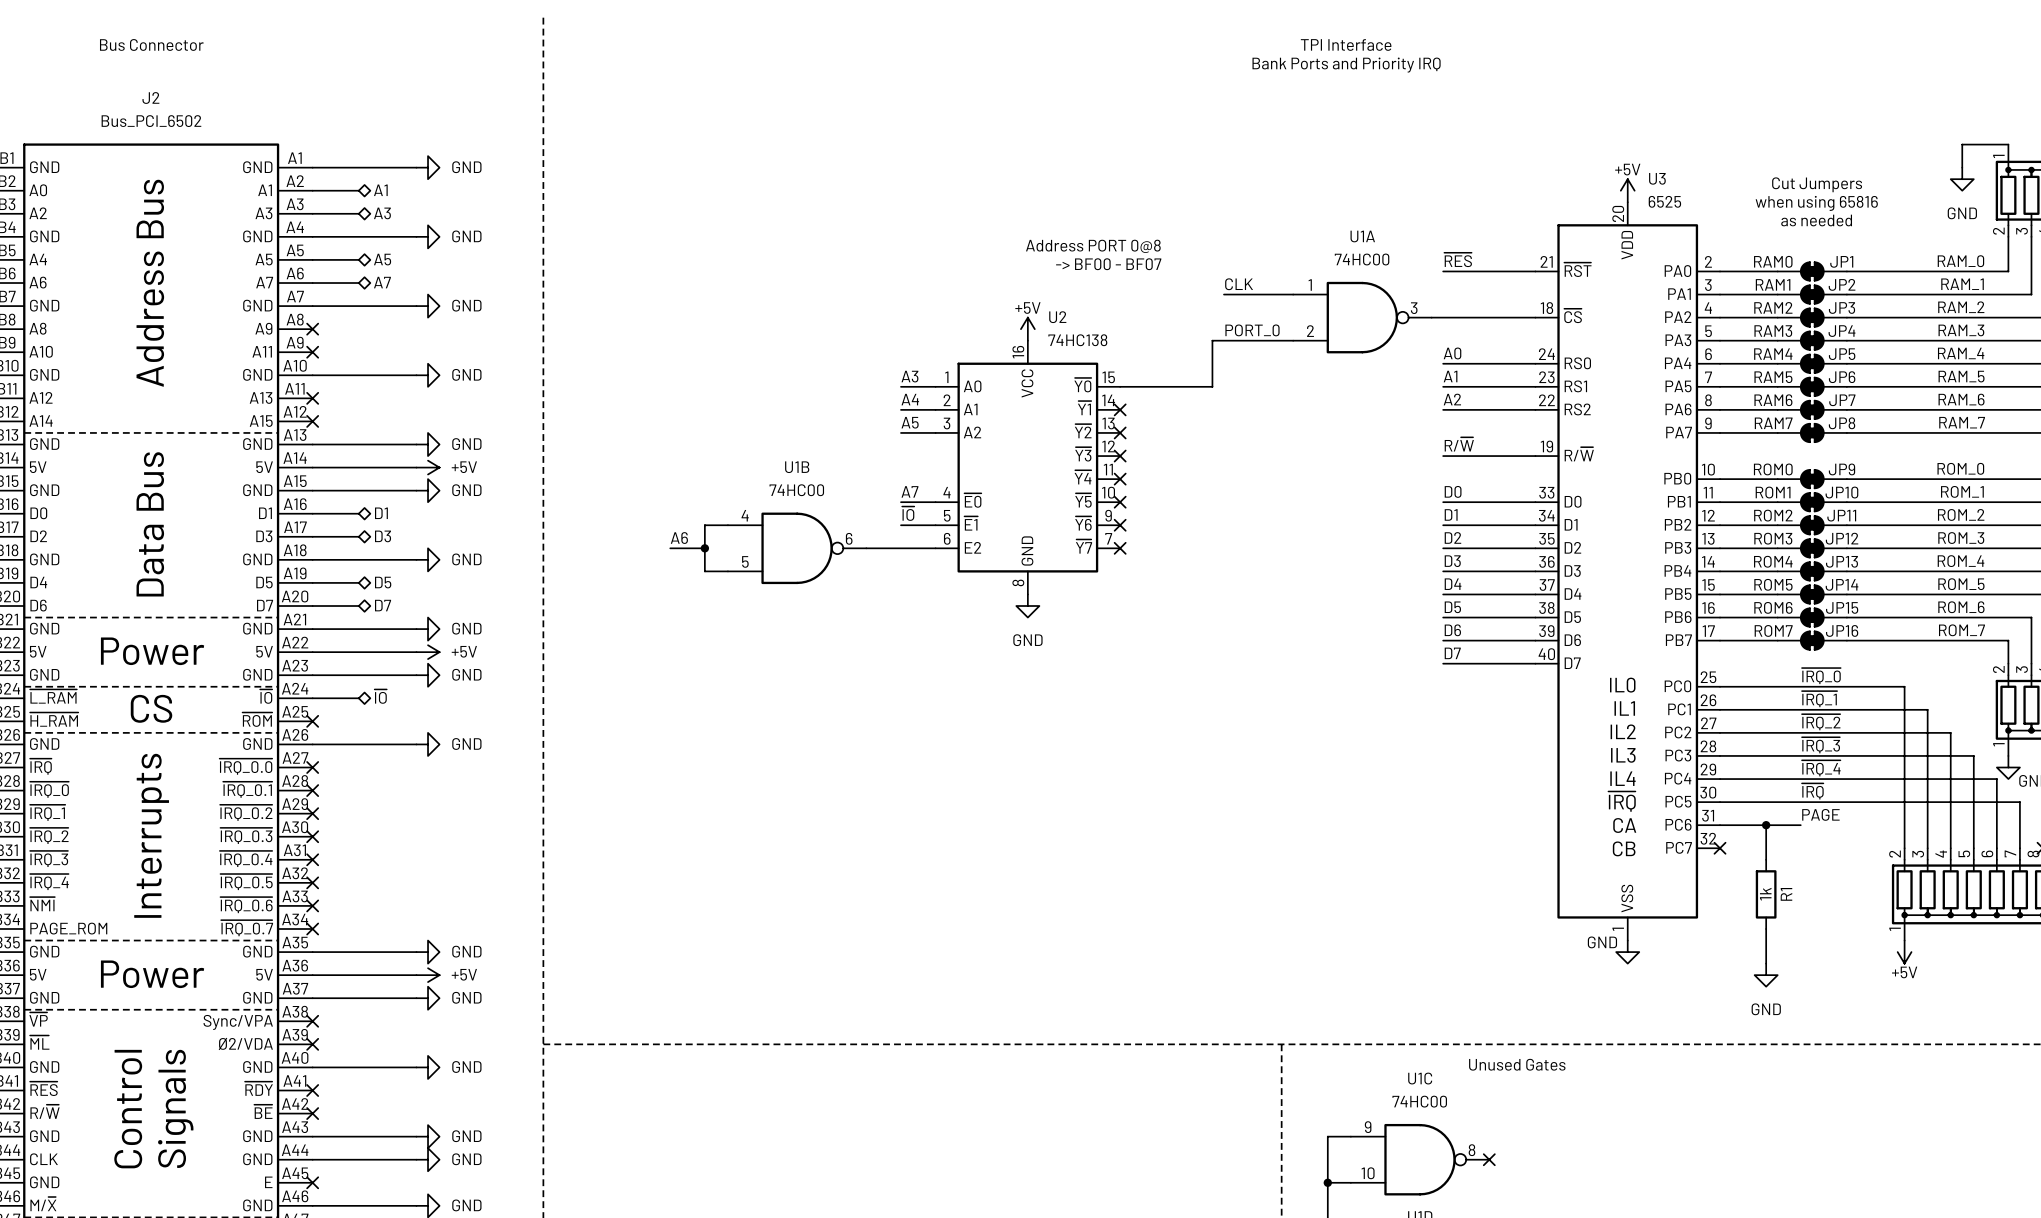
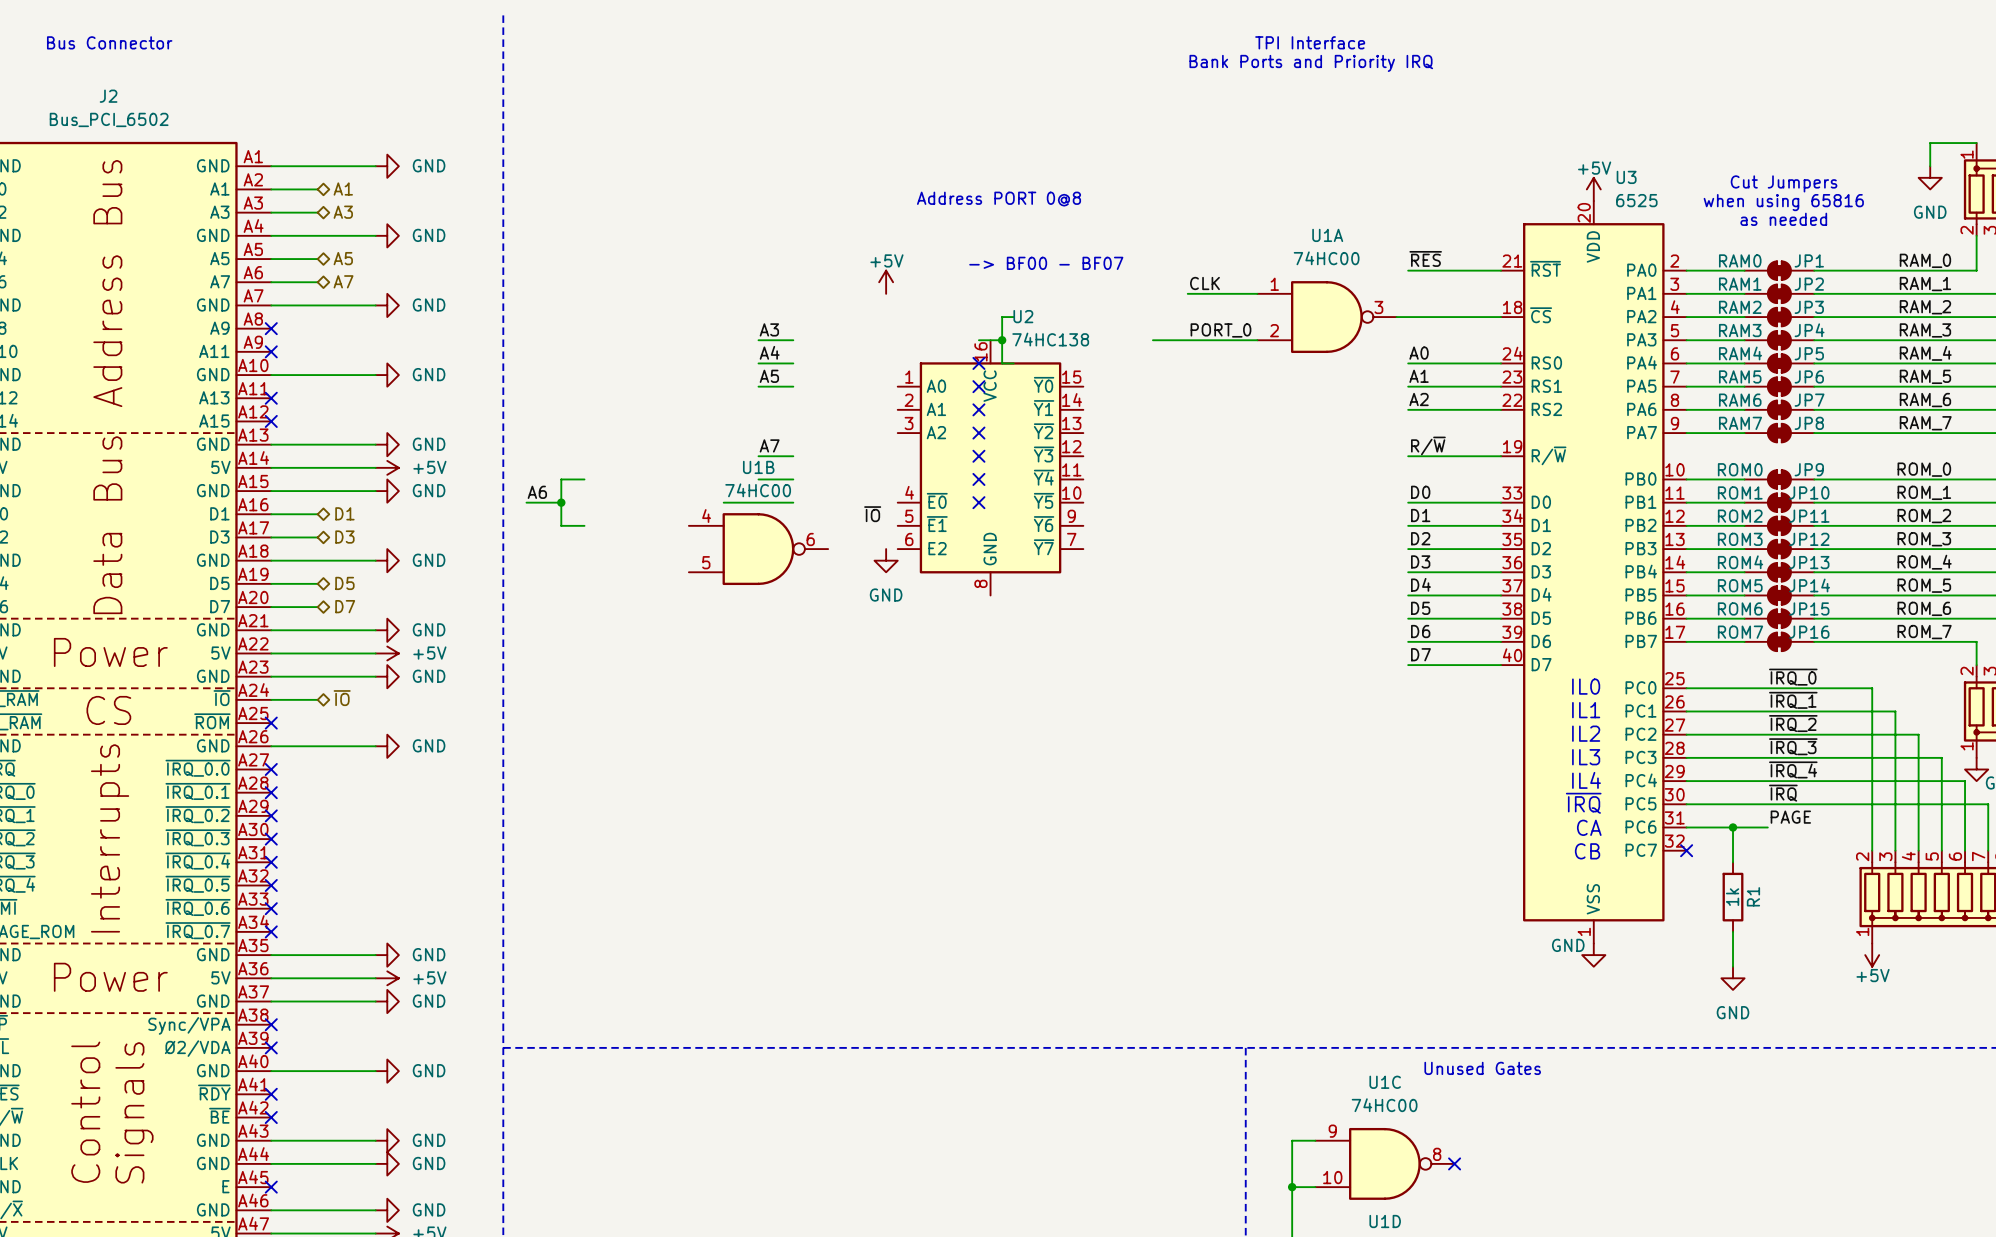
text position: Address PORT 0@8 (1093, 246) -> Address PORT 0@8 (999, 199)
wire: none -> (1013, 317) (1002, 317) (1002, 363) (1013, 363)
power symbol position: +5V (1027, 329) -> +5V (886, 282)
wire: none -> (978, 340) (1002, 340)
junction: none -> (1002, 340)
wire: (1212, 340) (1212, 386) (1120, 386) -> (1176, 340) (1152, 340)
no-connect mark: none -> (978, 363)
label position: A3 (909, 376) -> A3 (769, 329)
wire: (900, 386) (935, 386) -> (758, 340) (793, 340)
no-connect mark: none -> (978, 386)
label position: A4 (910, 399) -> A4 (769, 352)
wire: (900, 409) (935, 409) -> (758, 363) (793, 363)
no-connect mark: none -> (978, 409)
no-connect mark: (1120, 409) -> none
label position: A5 (910, 422) -> A5 (769, 376)
wire: (900, 432) (935, 432) -> (758, 386) (793, 386)
no-connect mark: none -> (978, 433)
no-connect mark: (1120, 432) -> none
no-connect mark: none -> (978, 456)
no-connect mark: (1120, 456) -> none
no-connect mark: none -> (978, 479)
no-connect mark: (1120, 479) -> none
label position: A7 (909, 491) -> A7 (769, 445)
junction: none -> (561, 502)
wire: (900, 502) (935, 502) -> (758, 456) (793, 456)
no-connect mark: none -> (978, 502)
no-connect mark: (1120, 502) -> none
wire: (727, 525) (704, 525) (704, 571) (727, 571) -> (584, 479) (561, 479) (561, 525) (584, 525)
wire: (900, 525) (935, 525) -> (758, 479) (793, 479)
no-connect mark: (1120, 525) -> none
label position: A6 (679, 538) -> A6 (537, 492)
wire: (670, 548) (704, 548) -> (526, 502) (561, 502)
junction: (704, 548) -> none
wire: (866, 548) (935, 548) -> (723, 502) (793, 502)
no-connect mark: (1120, 548) -> none
power symbol position: GND (1027, 606) -> GND (886, 560)

